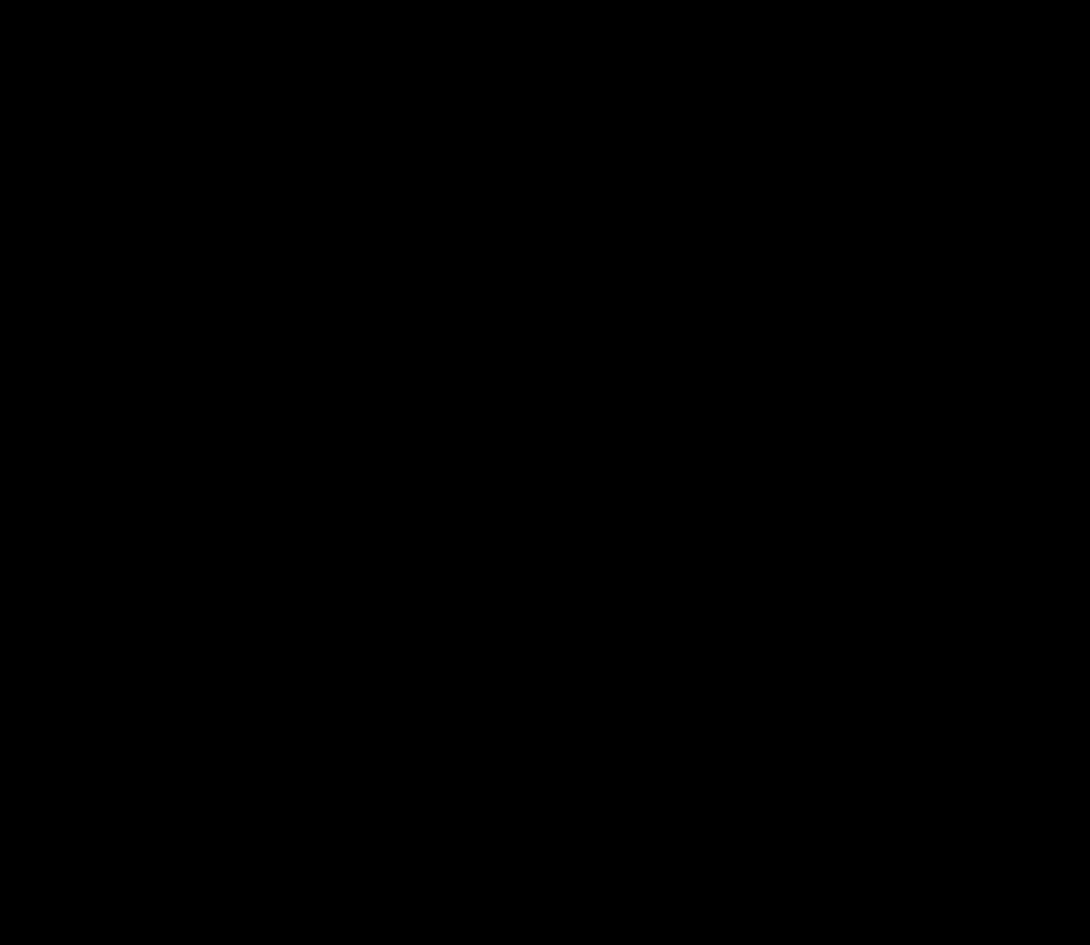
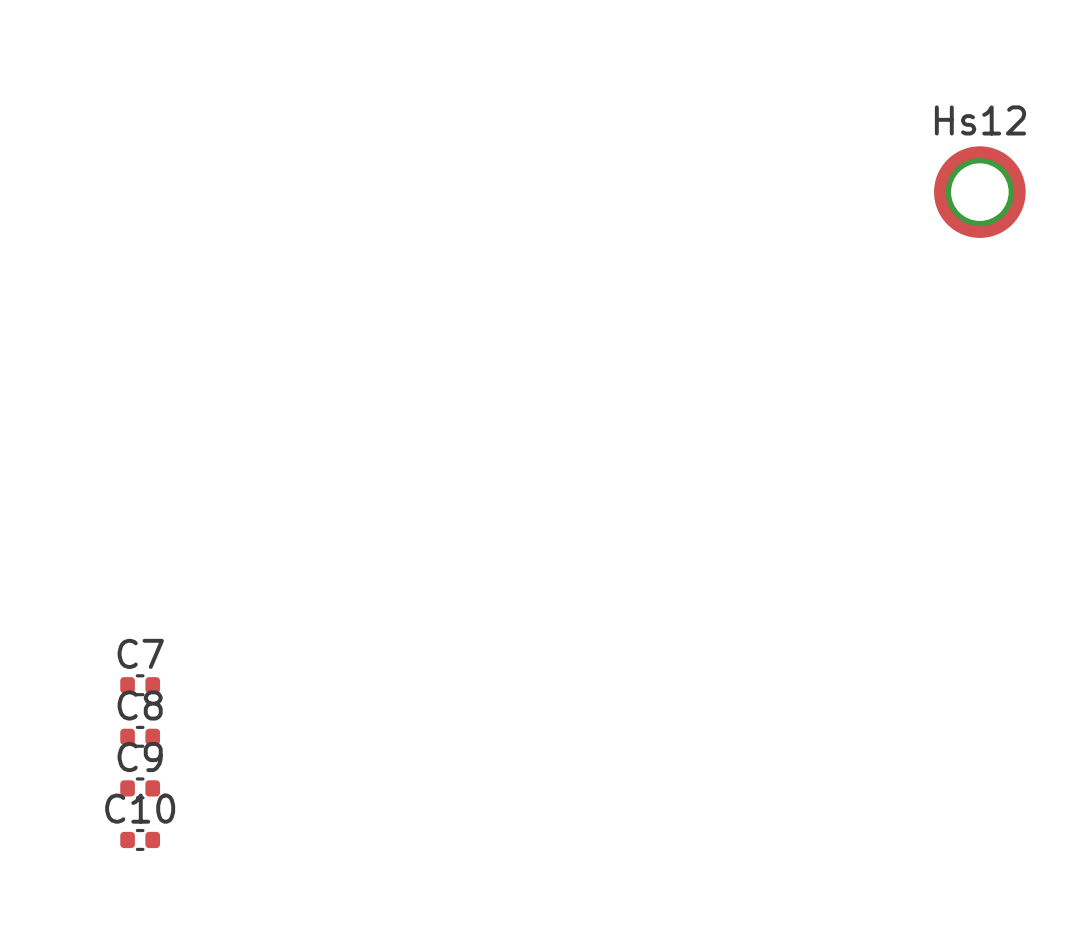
Hs12: none -> (979, 192)
C7: none -> (140, 685)
C8: none -> (140, 736)
C9: none -> (140, 788)
C10: none -> (140, 839)

